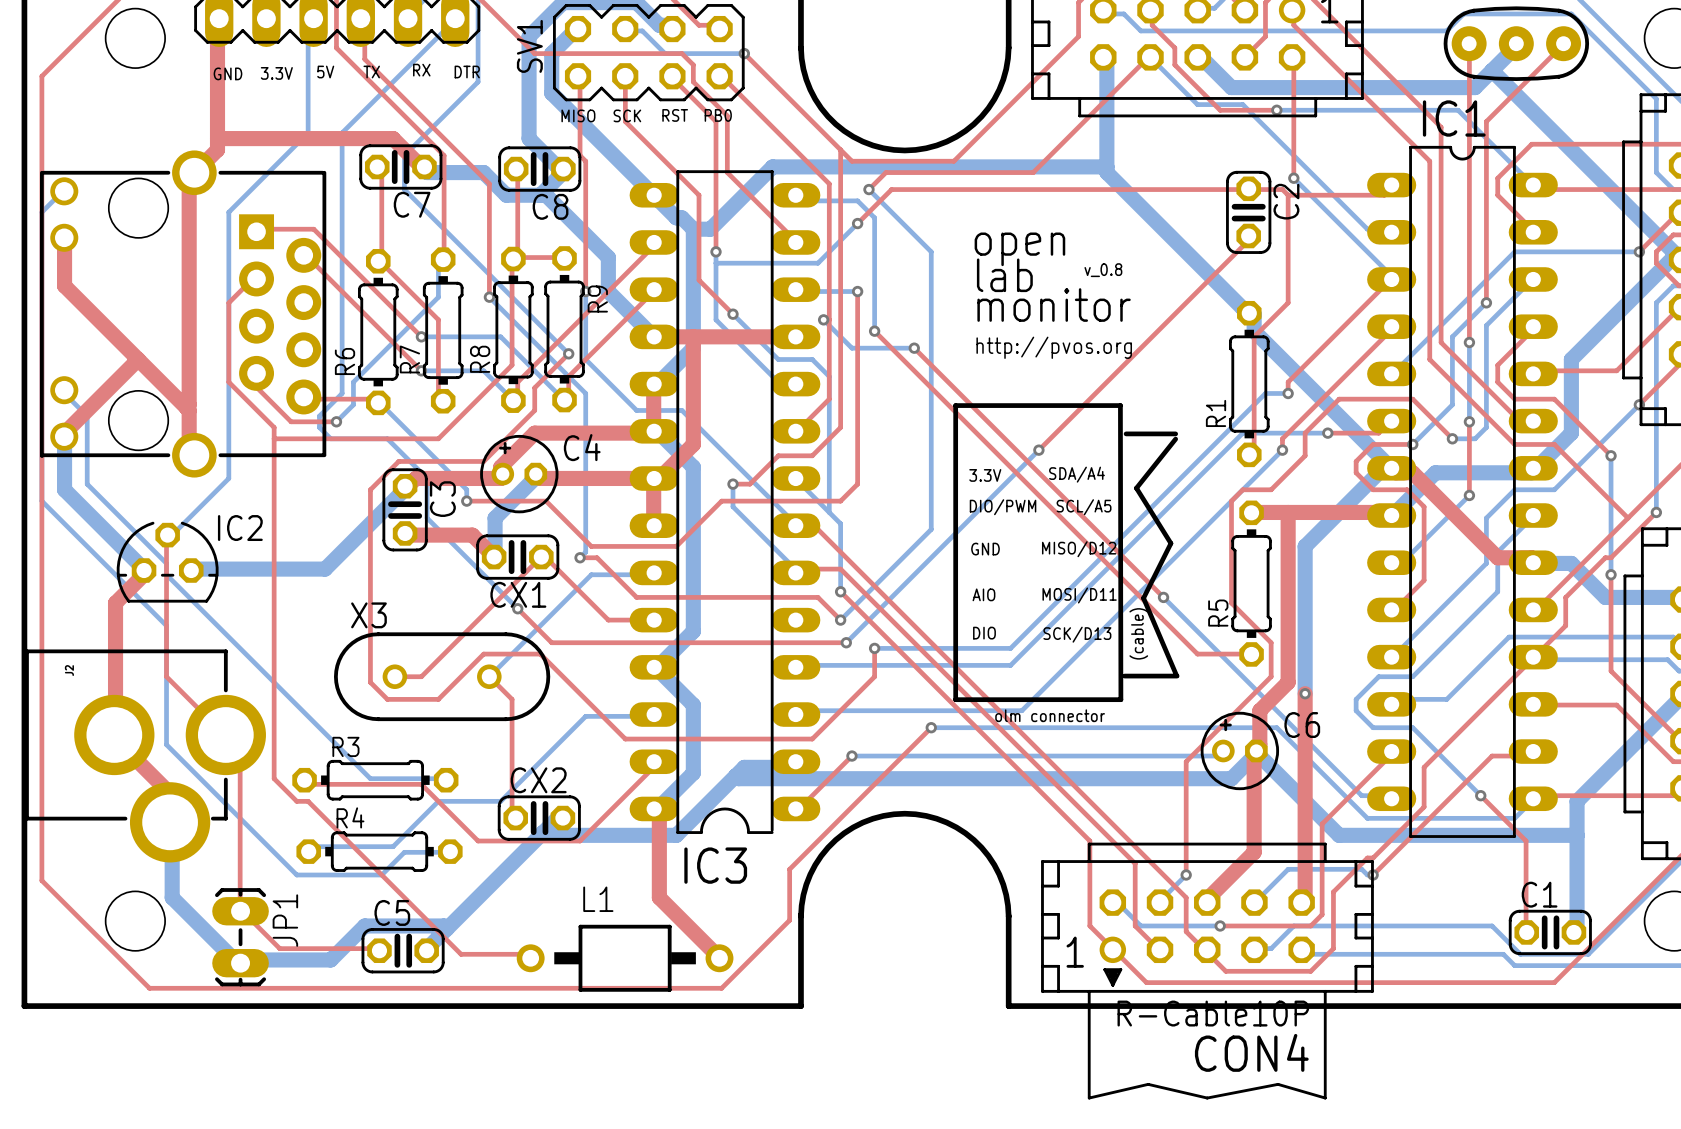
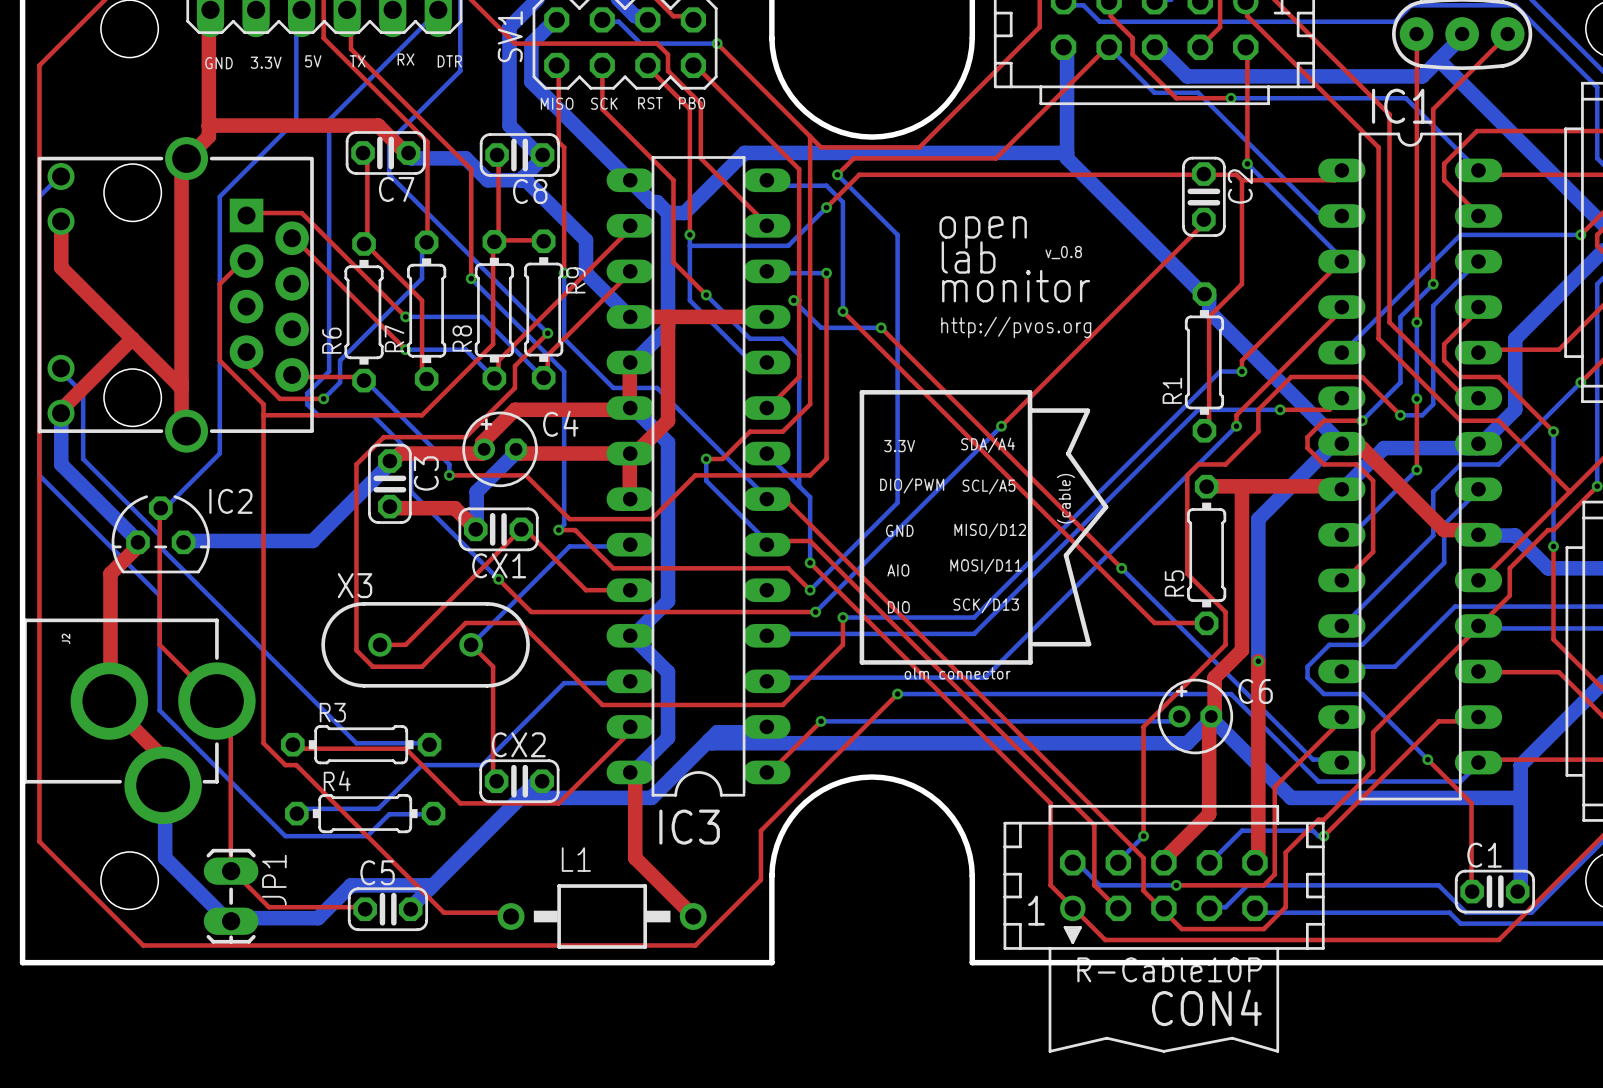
line: (955, 405) (1120, 405) (1120, 699) (955, 699) (955, 405) -> none
line: none -> (861, 392) (1030, 392) (1030, 662) (861, 662) (861, 392)
line: none -> (1030, 410) (1085, 410)
line: (1128, 433) (1175, 433) -> (1087, 410) (1068, 453) (1106, 507) (1065, 555) (1088, 643)
line: (1175, 439) (1136, 488) (1170, 543) (1143, 598) (1176, 675) -> none
text position: SDA/A4 (1076, 474) -> SDA/A4 (988, 445)
text position: 3.3V (985, 475) -> 3.3V (899, 446)
text position: DIO/PWM (1003, 507) -> DIO/PWM (912, 485)
text position: SCL/A5 (1084, 507) -> SCL/A5 (988, 486)
text position: GND (985, 549) -> GND (899, 530)
text position: MISO/D12 (1079, 549) -> MISO/D12 (990, 530)
text position: AIO (983, 594) -> AIO (898, 570)
text position: MOSI/D11 (1079, 595) -> MOSI/D11 (986, 566)
text position: DIO (984, 633) -> DIO (898, 607)
text position: (cable) (1138, 633) -> (cable) (1065, 498)
text position: SCK/D13 (1077, 634) -> SCK/D13 (986, 605)
line: none -> (1034, 644) (1084, 644)
line: (1129, 676) (1177, 676) -> none
text position: olm connector (1050, 715) -> olm connector (957, 673)

